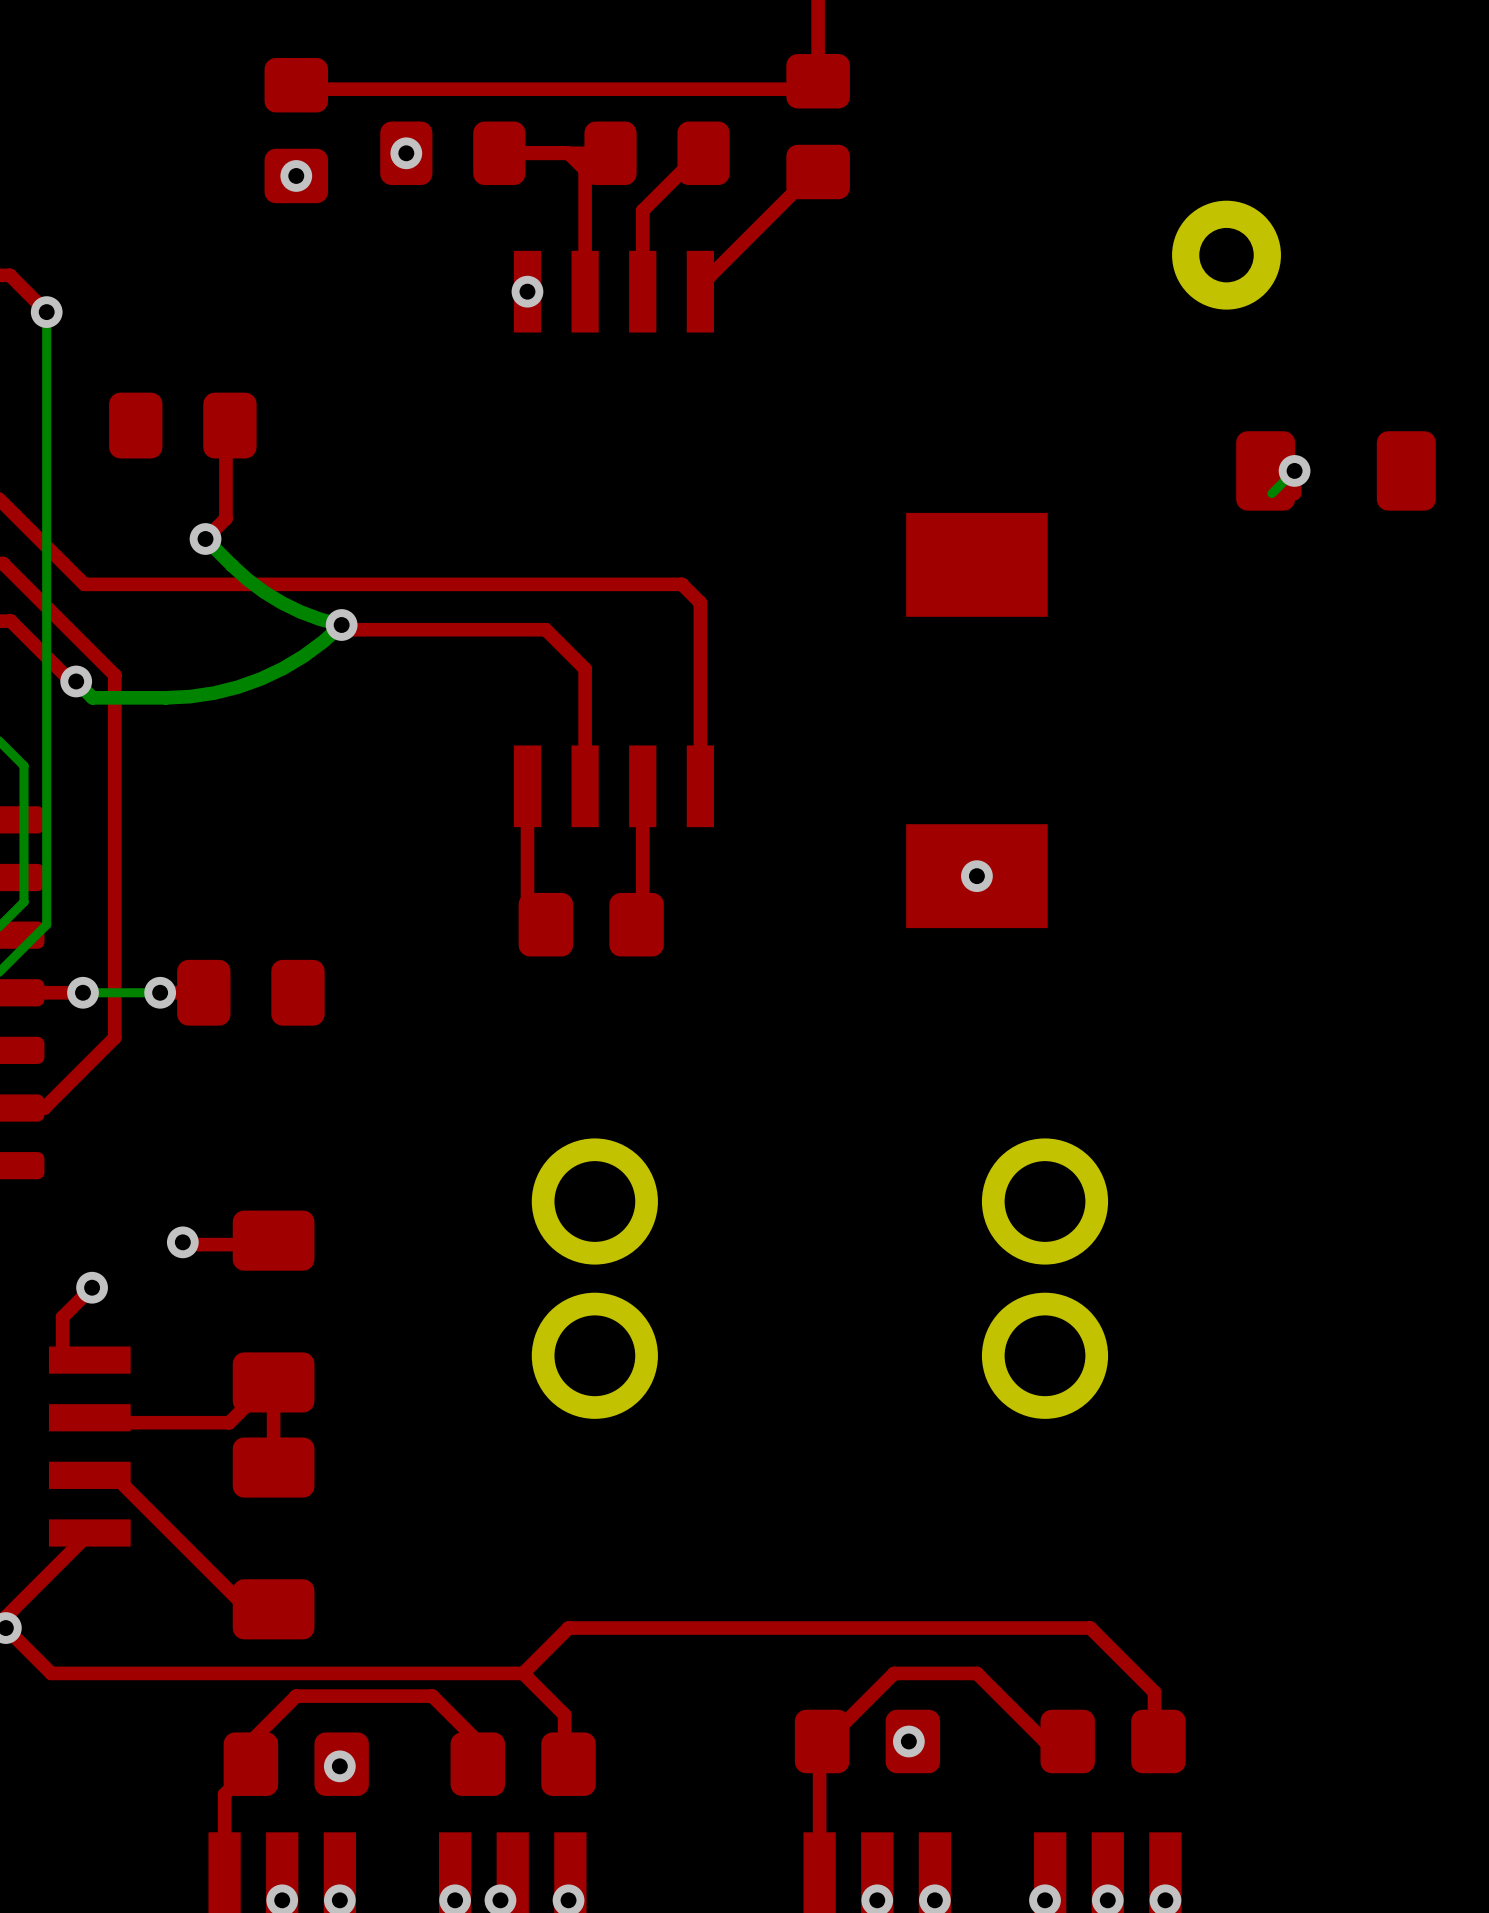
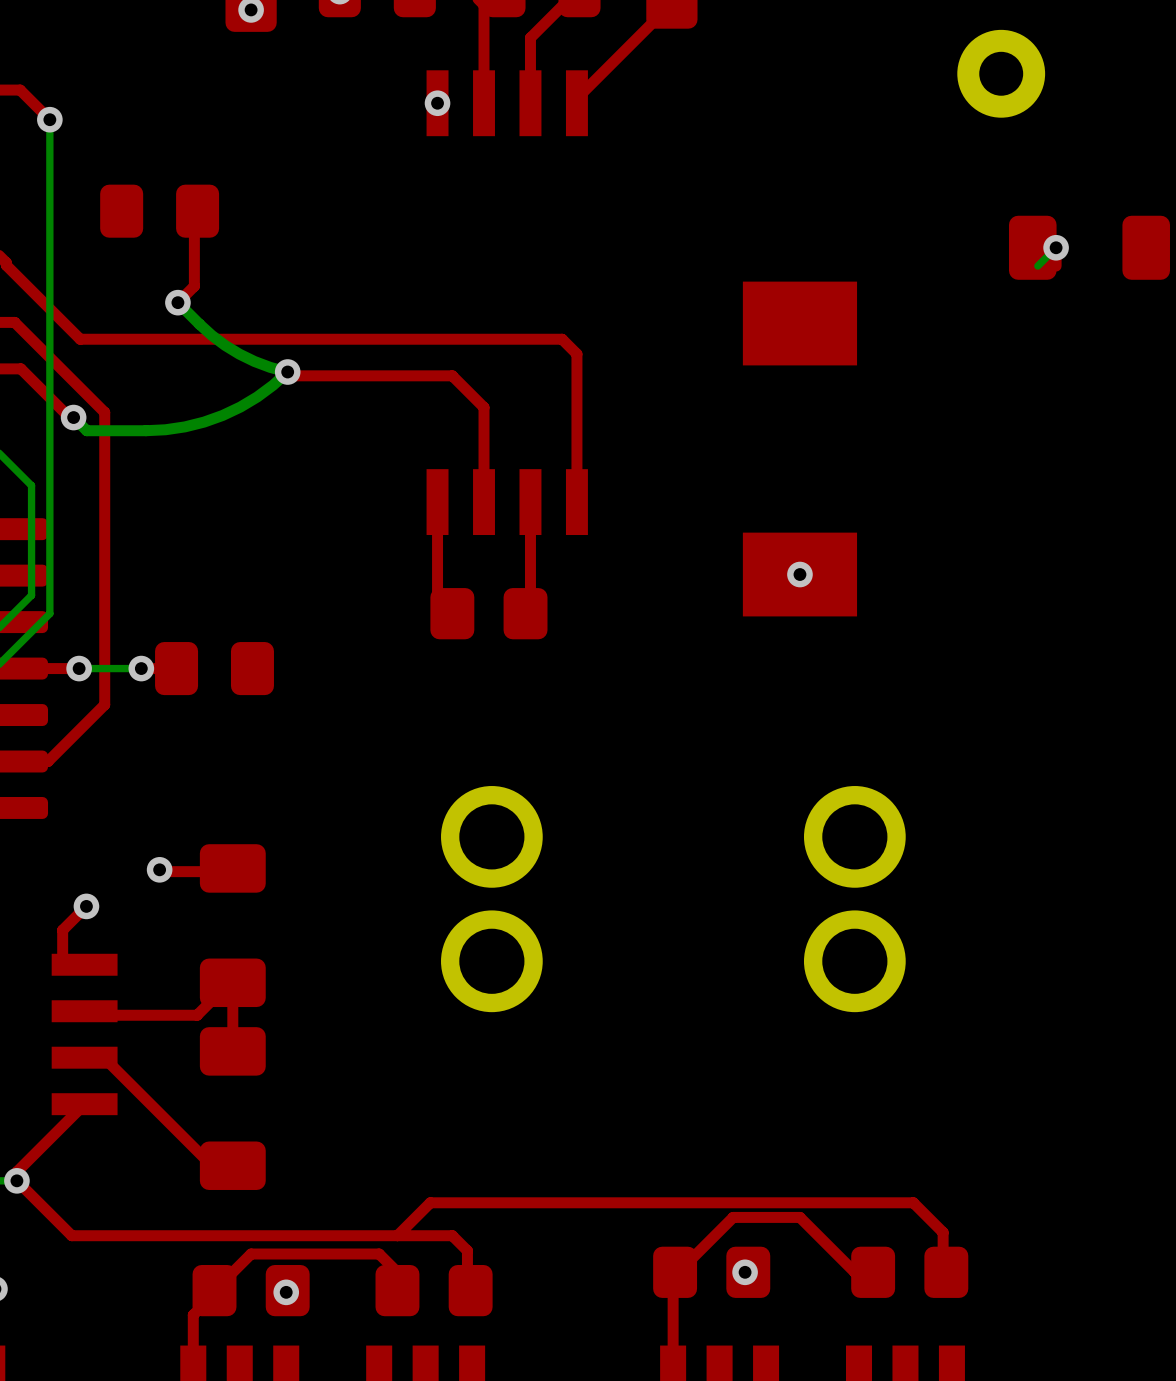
top track: (1117, 1655) (1090, 1628) (568, 1628) (523, 1673) -> (913, 1202) (430, 1202) (397, 1235)
top track: (523, 1673) (545, 1696) -> (360, 1235) (452, 1235)
top track: (523, 1673) (51, 1673) -> none
top track: (296, 1696) (250, 1741) (250, 1764) -> (251, 1235) (71, 1235) (53, 1217)
top track: (432, 1696) (455, 1718) -> (217, 1290) (217, 1287) (251, 1254) (379, 1254)

